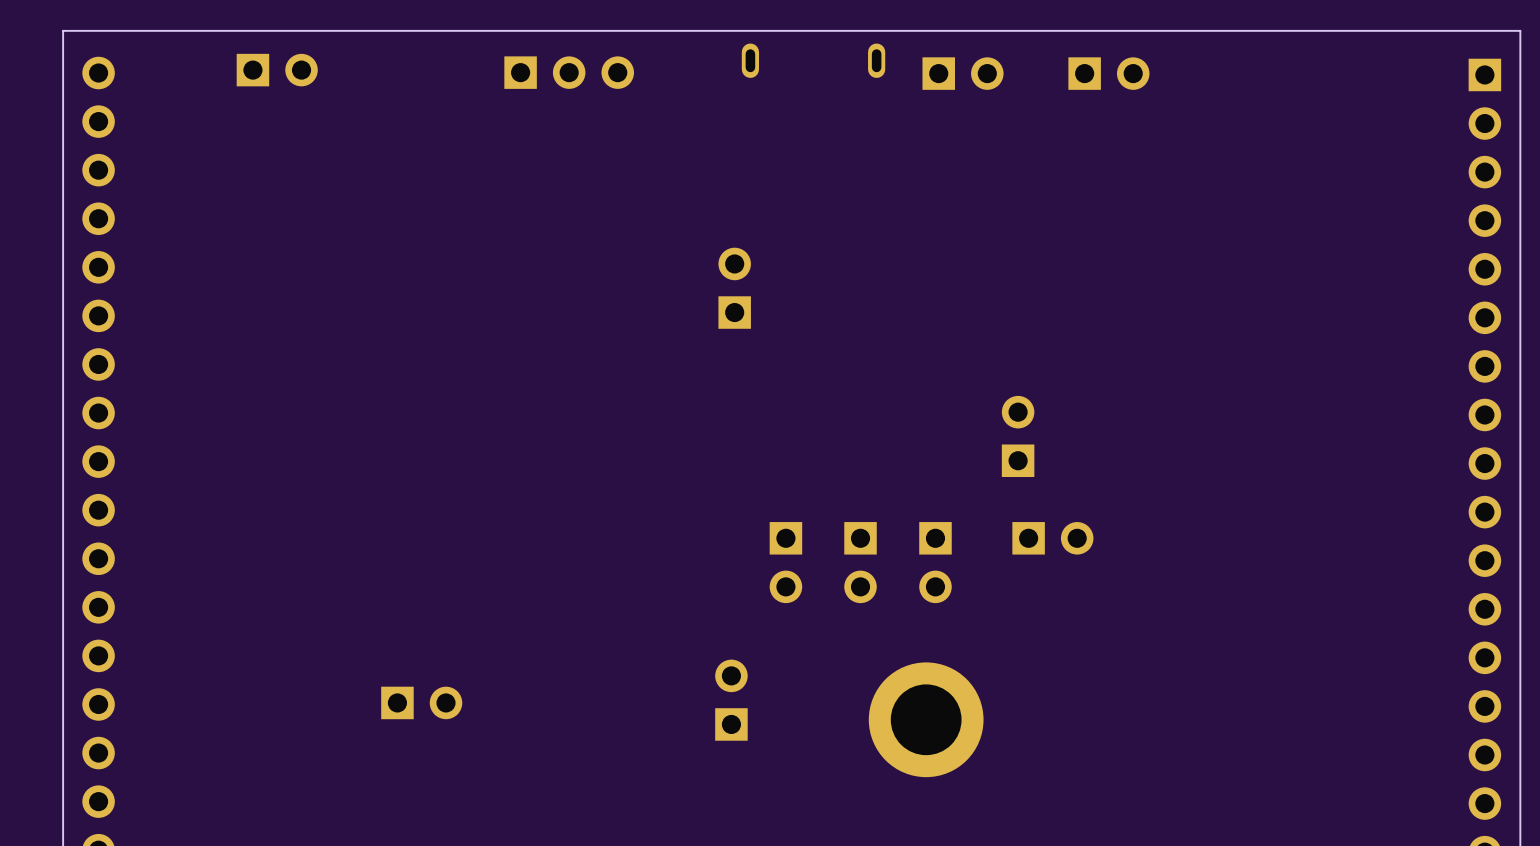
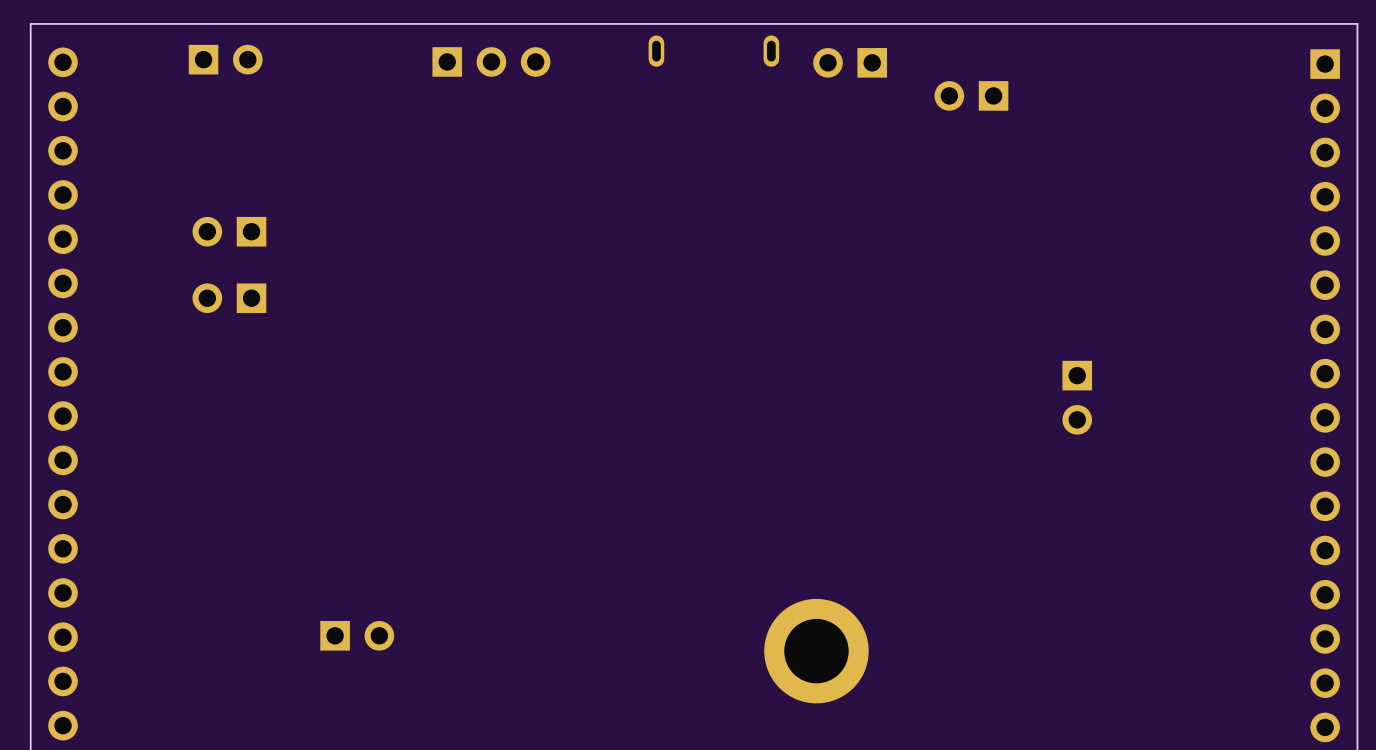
part rotation: 0° (963, 73) -> 180° (850, 62)
part rotation: 0° (1108, 73) -> 180° (971, 95)
part: none -> (229, 231)
part: (734, 288) -> none
part: none -> (229, 298)
part: (1018, 436) -> none
part: none -> (1077, 397)
part: (1052, 538) -> none
part: (785, 562) -> none
part: (860, 562) -> none
part: (935, 562) -> none
part: (731, 700) -> none

